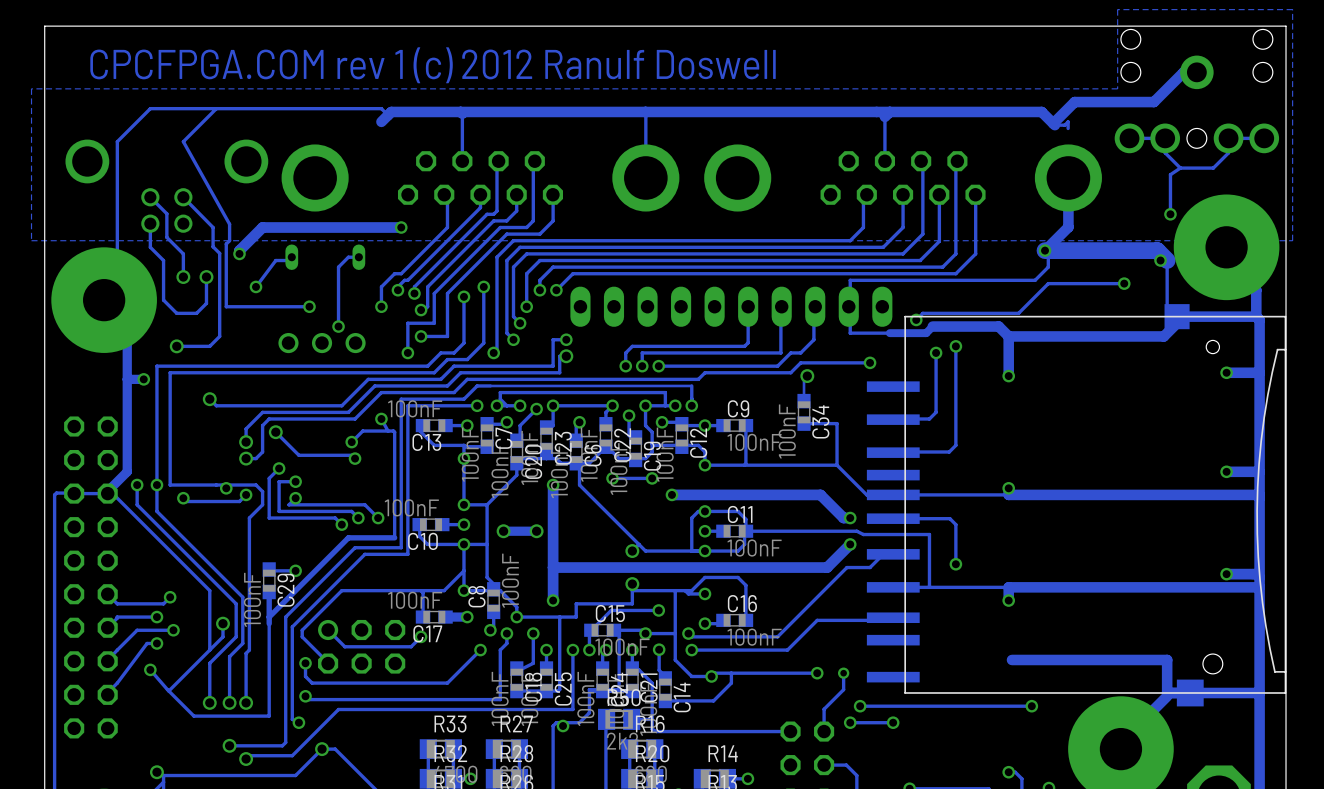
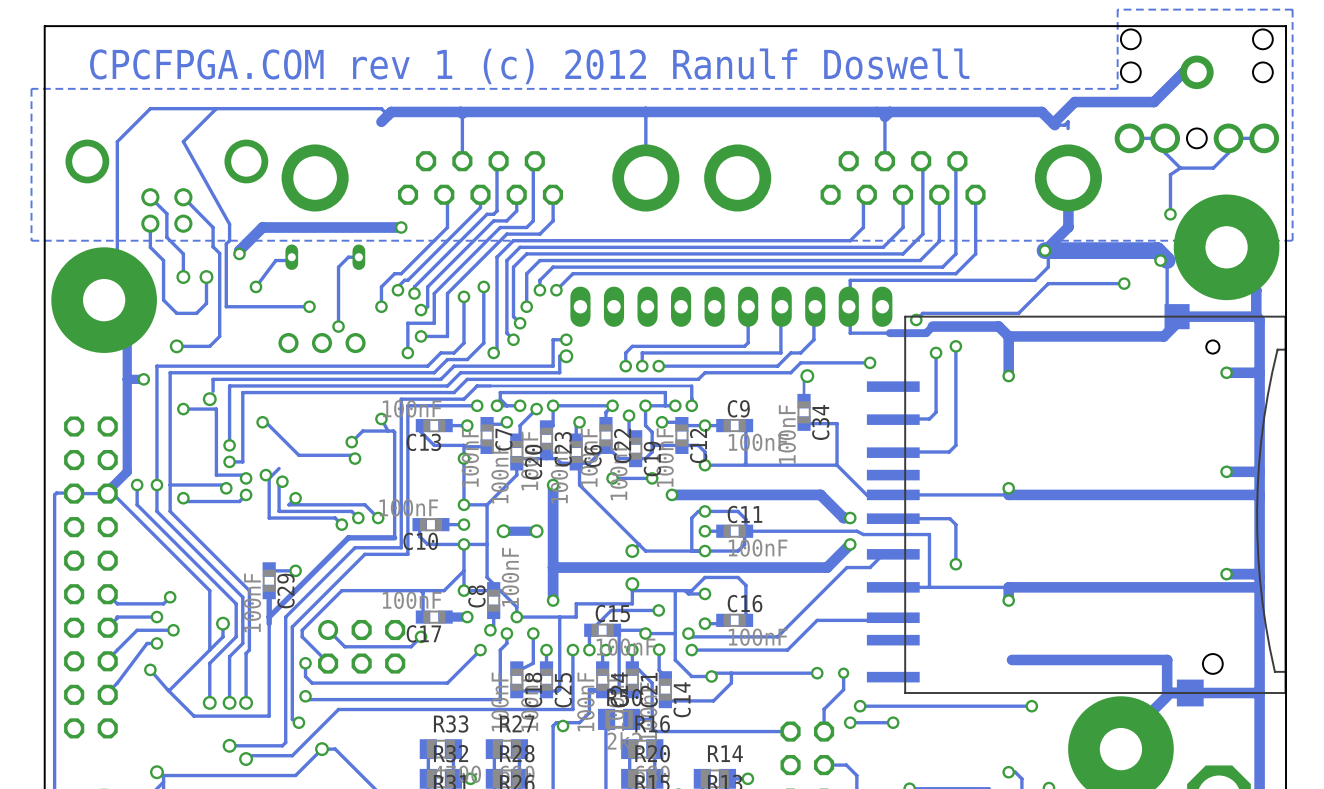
track: (368, 379) (341, 405) (216, 405) (209, 399) -> (368, 379) (213, 379) (213, 391)
track: (374, 385) (348, 412) (262, 412) (246, 428) (246, 442) -> (374, 385) (229, 385) (229, 445)
track: (381, 392) (355, 418) (269, 418) (262, 425) (262, 452) (256, 458) (246, 458) -> (381, 392) (242, 392) (242, 461) (229, 461)
track: none -> (183, 409) (216, 409) (216, 475) (246, 475) (246, 478)
via: none -> (183, 409)
track: none -> (262, 422) (265, 422) (275, 432)
via: none -> (262, 422)
via: (275, 432) -> none
via: (246, 442) -> none
via: none -> (229, 445)
via: (246, 458) -> none
via: none -> (229, 461)
via: (279, 468) -> none
via: none -> (265, 475)
via: none -> (246, 478)
via: none -> (282, 481)
track: (295, 481) (282, 481) -> none
via: (295, 481) -> none
track: (222, 485) (256, 485) (262, 491) (262, 504) (249, 518) (249, 590) -> (170, 485) (170, 511) (249, 590)

